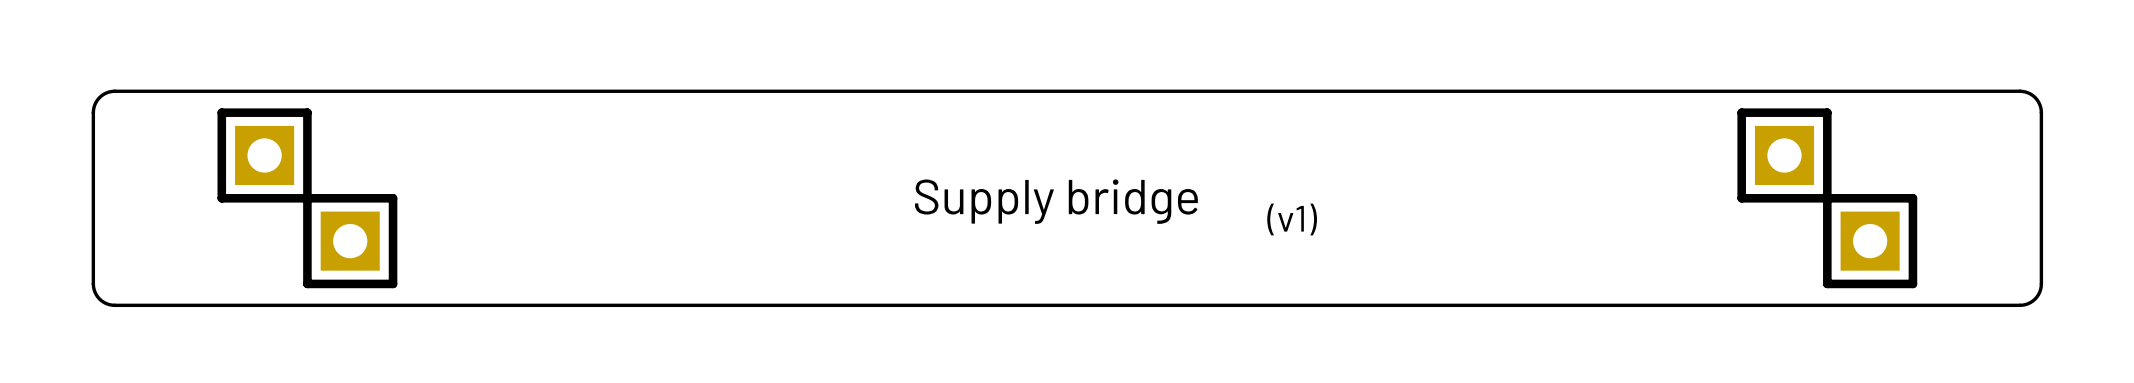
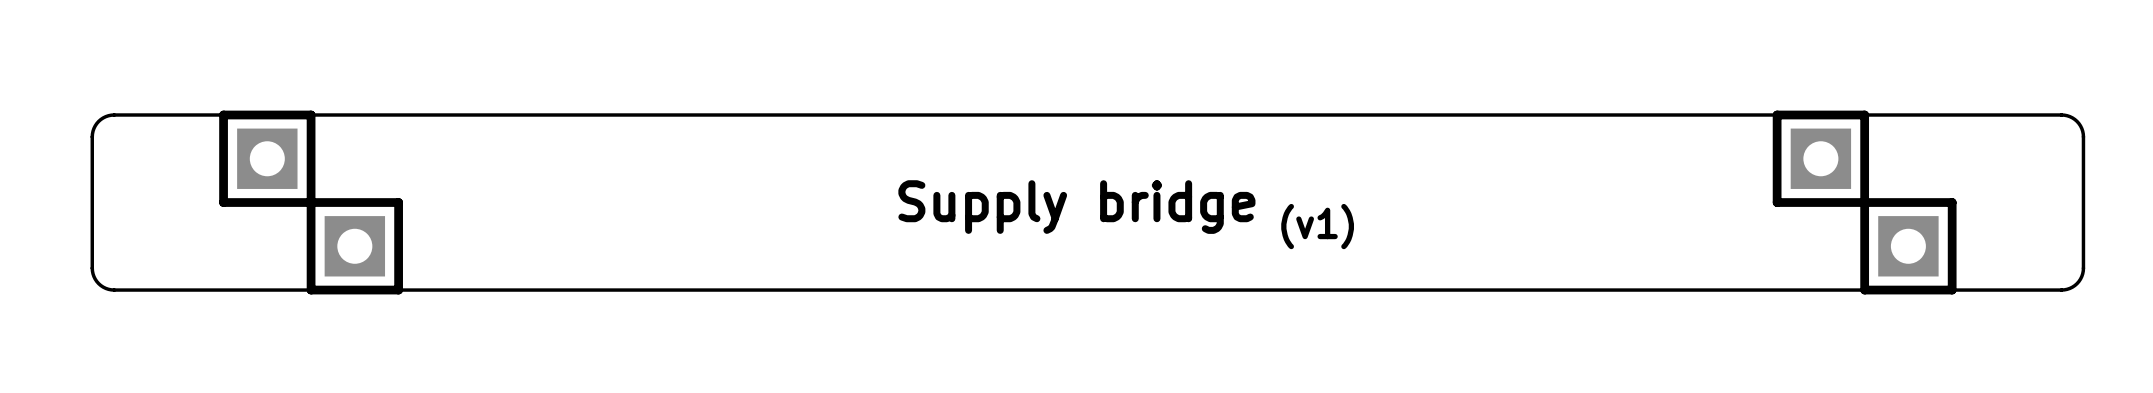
board edge: (114, 91) (2019, 91) (2030, 94) (2038, 101) (2041, 109) (2041, 134) -> (92, 136) (93, 128) (98, 121) (105, 116) (114, 115) (2061, 115) (2069, 116) (2077, 121) (2081, 128) (2083, 136)
board edge: (114, 91) (104, 94) (96, 101) (93, 109) (93, 134) -> none
board edge: (93, 262) (93, 286) (96, 294) (104, 302) (114, 305) (2019, 305) (2030, 302) (2038, 294) (2041, 286) (2041, 262) -> (92, 268) (93, 276) (98, 283) (105, 288) (114, 290) (2061, 290) (2069, 288) (2077, 283) (2081, 276) (2083, 268)

